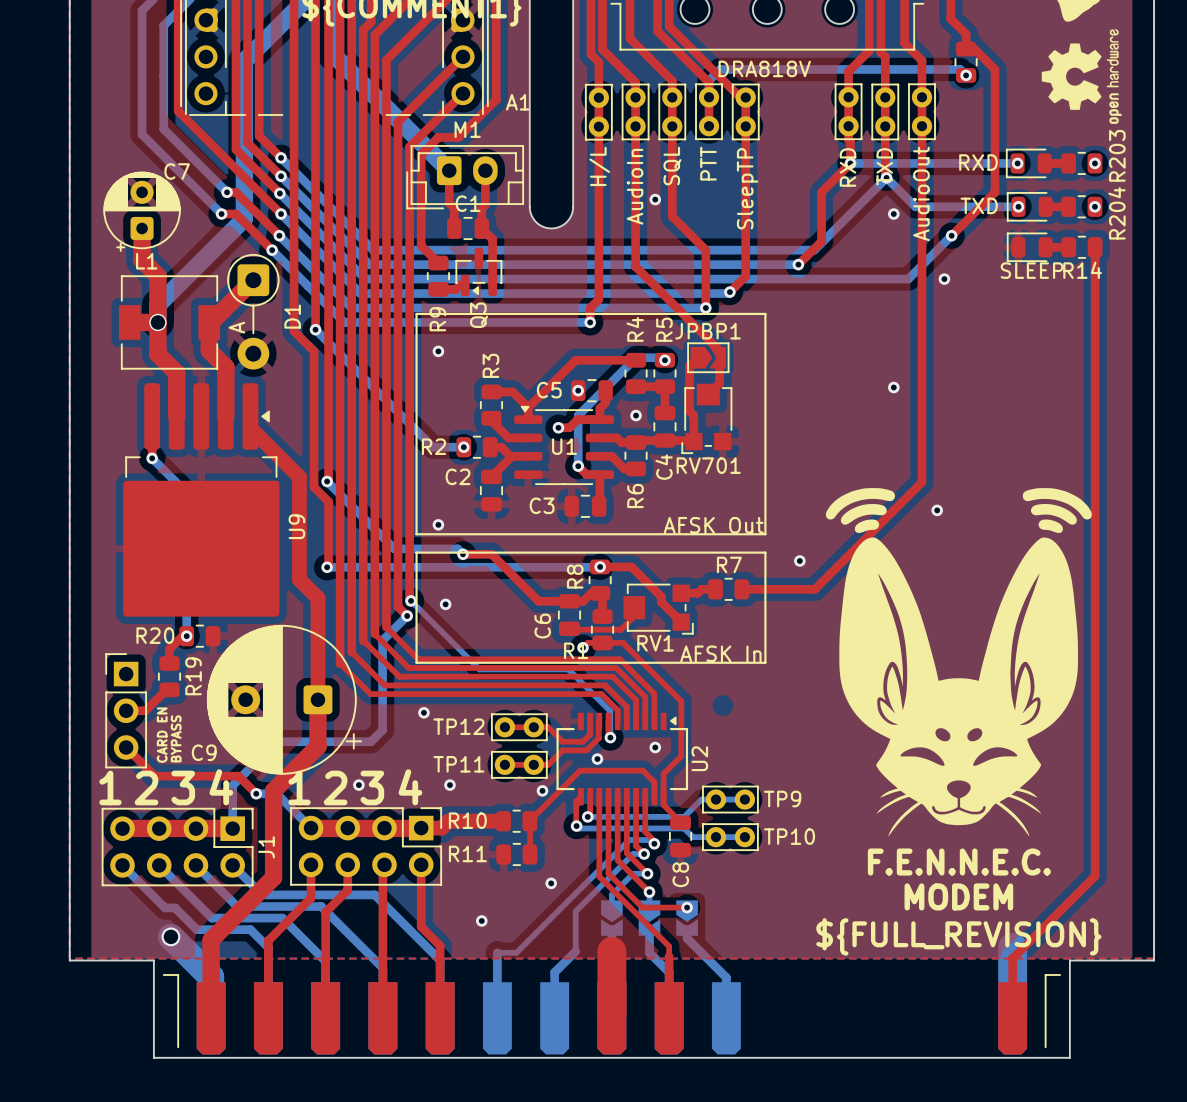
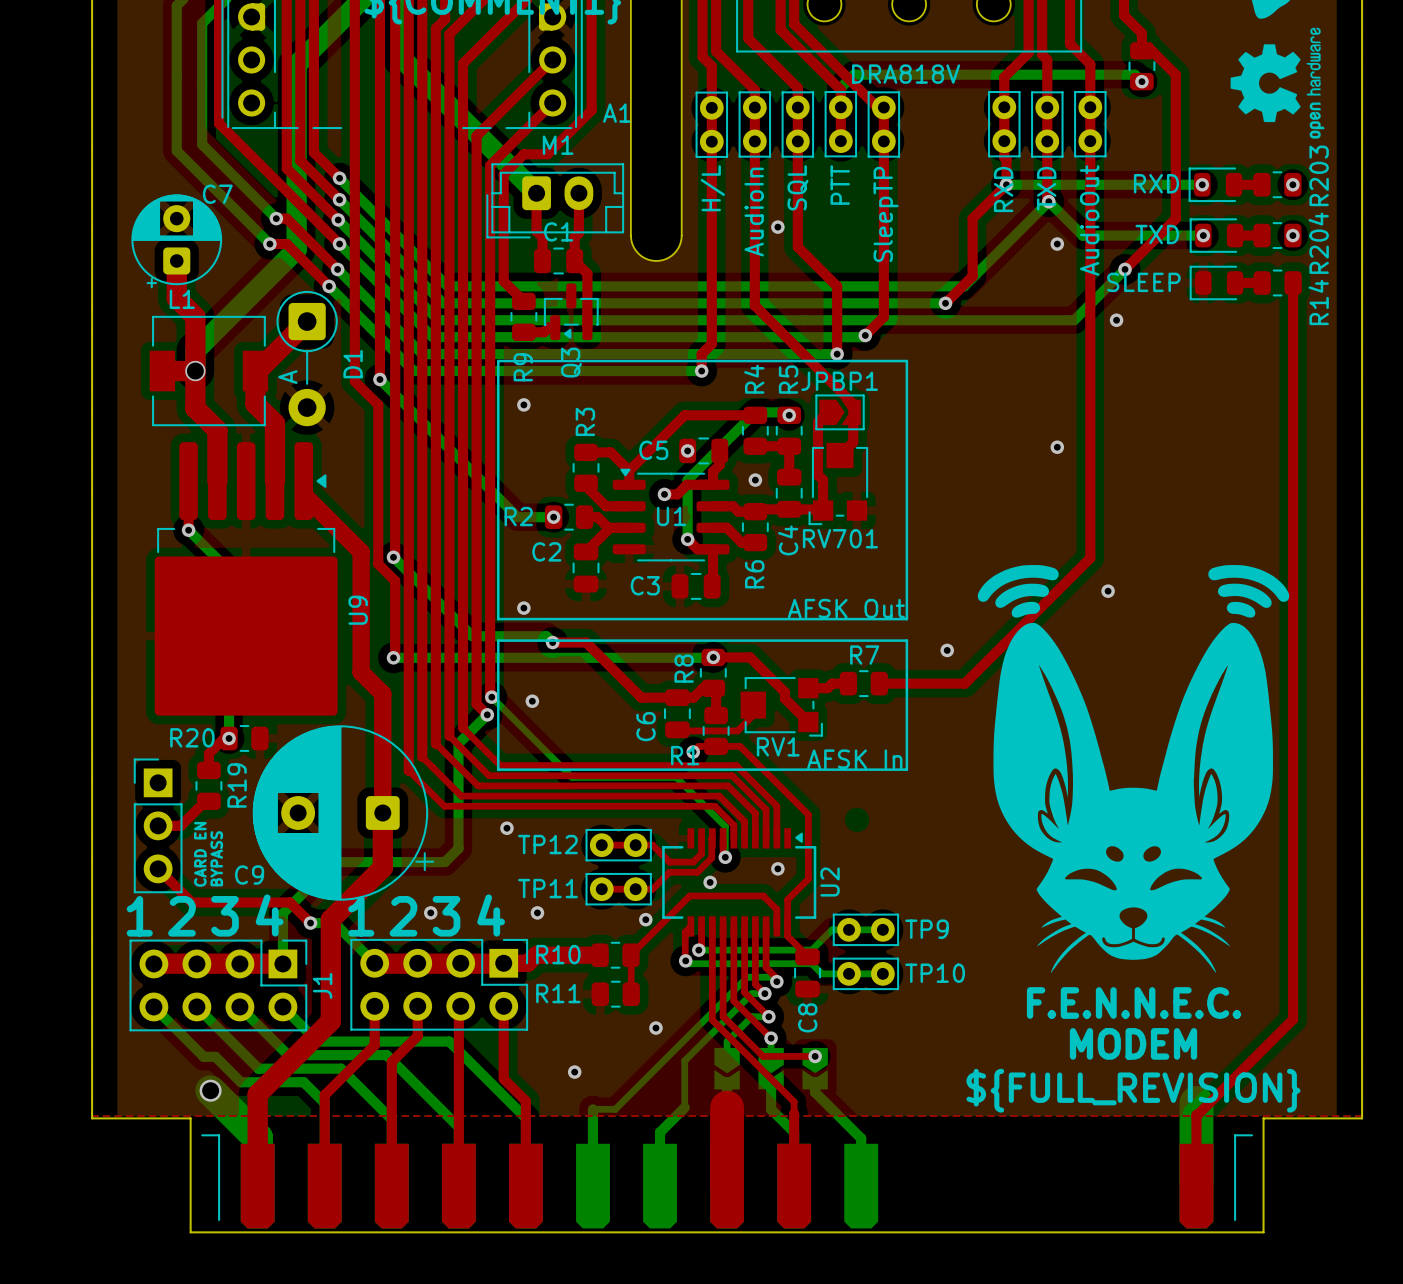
part value position: SLEEP (1032, 270) -> SLEEP (1143, 282)
R14 name rotation: 0° (1082, 270) -> 90° counterclockwise (1318, 302)

